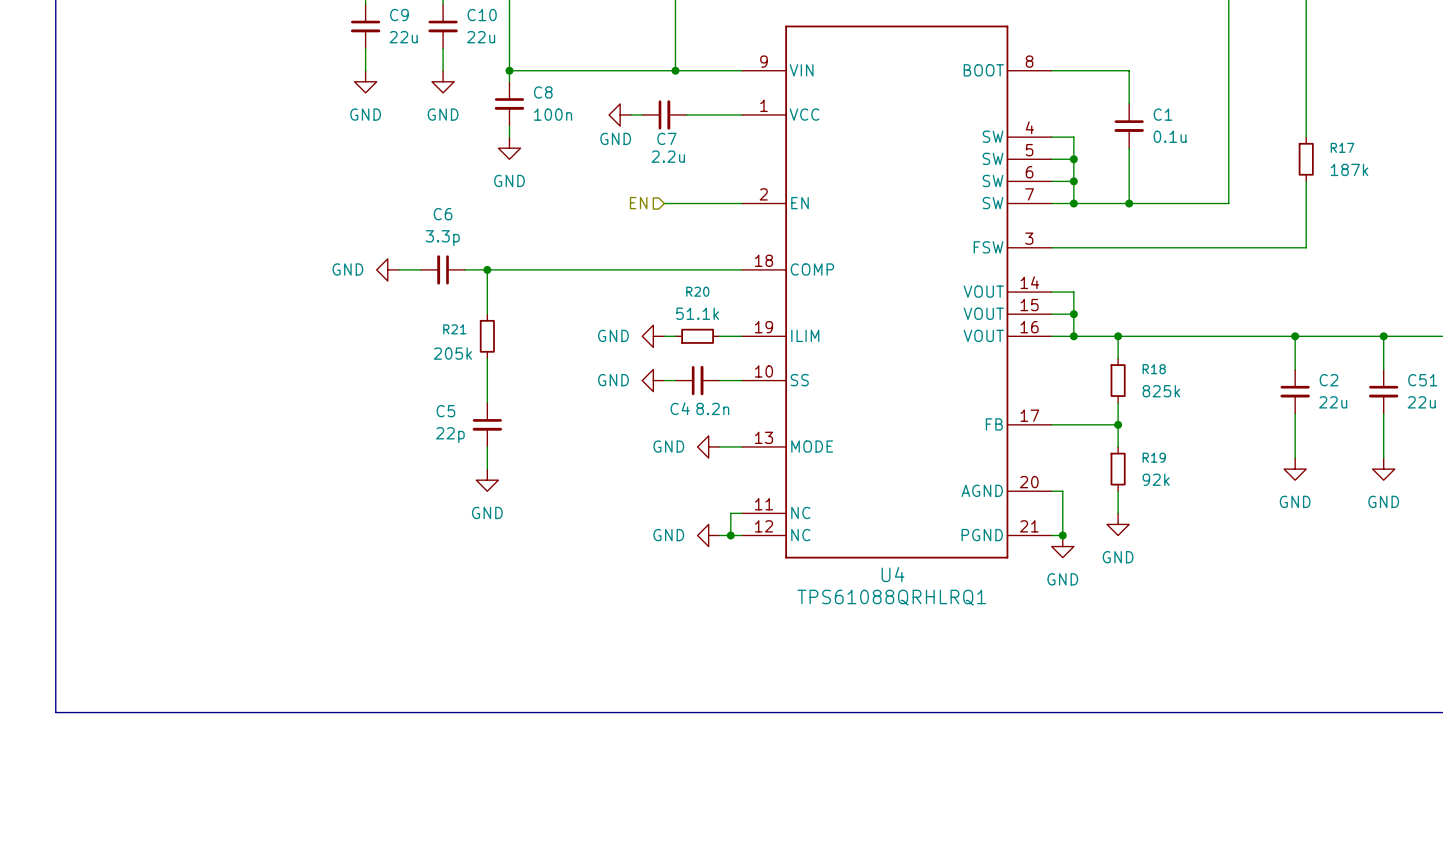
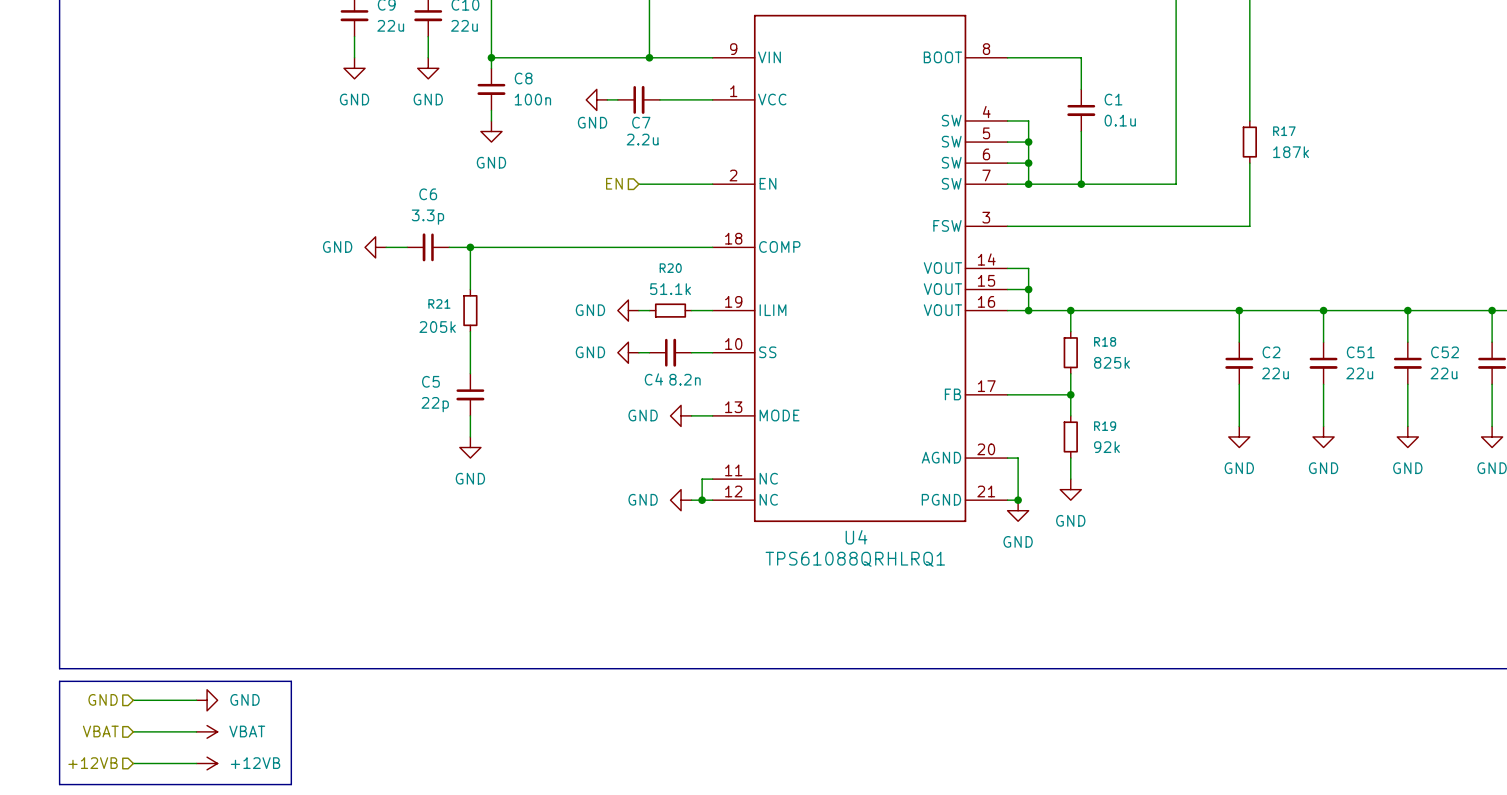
line: none -> (59, 681) (291, 681) (291, 784) (59, 784) (59, 681)
hierarchical label: none -> GND (103, 699)
wire: none -> (133, 700) (196, 700)
power symbol: none -> GND (207, 700)
hierarchical label: none -> VBAT (100, 731)
wire: none -> (133, 731) (196, 731)
power symbol: none -> VBAT (207, 731)
hierarchical label: none -> +12VB (93, 763)
wire: none -> (133, 763) (196, 763)
power symbol: none -> +12VB (207, 763)

